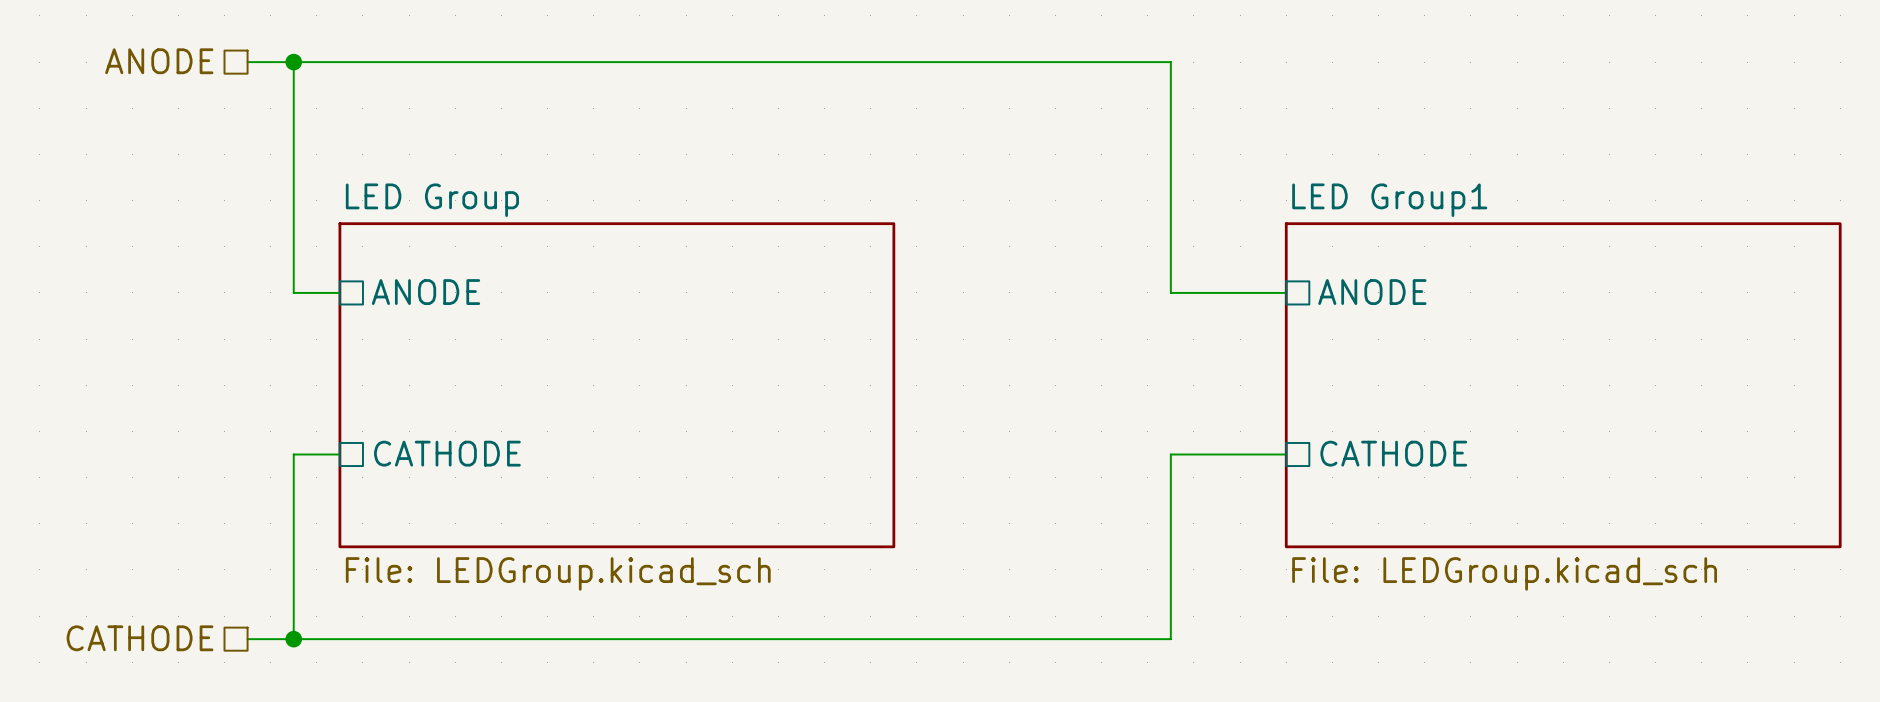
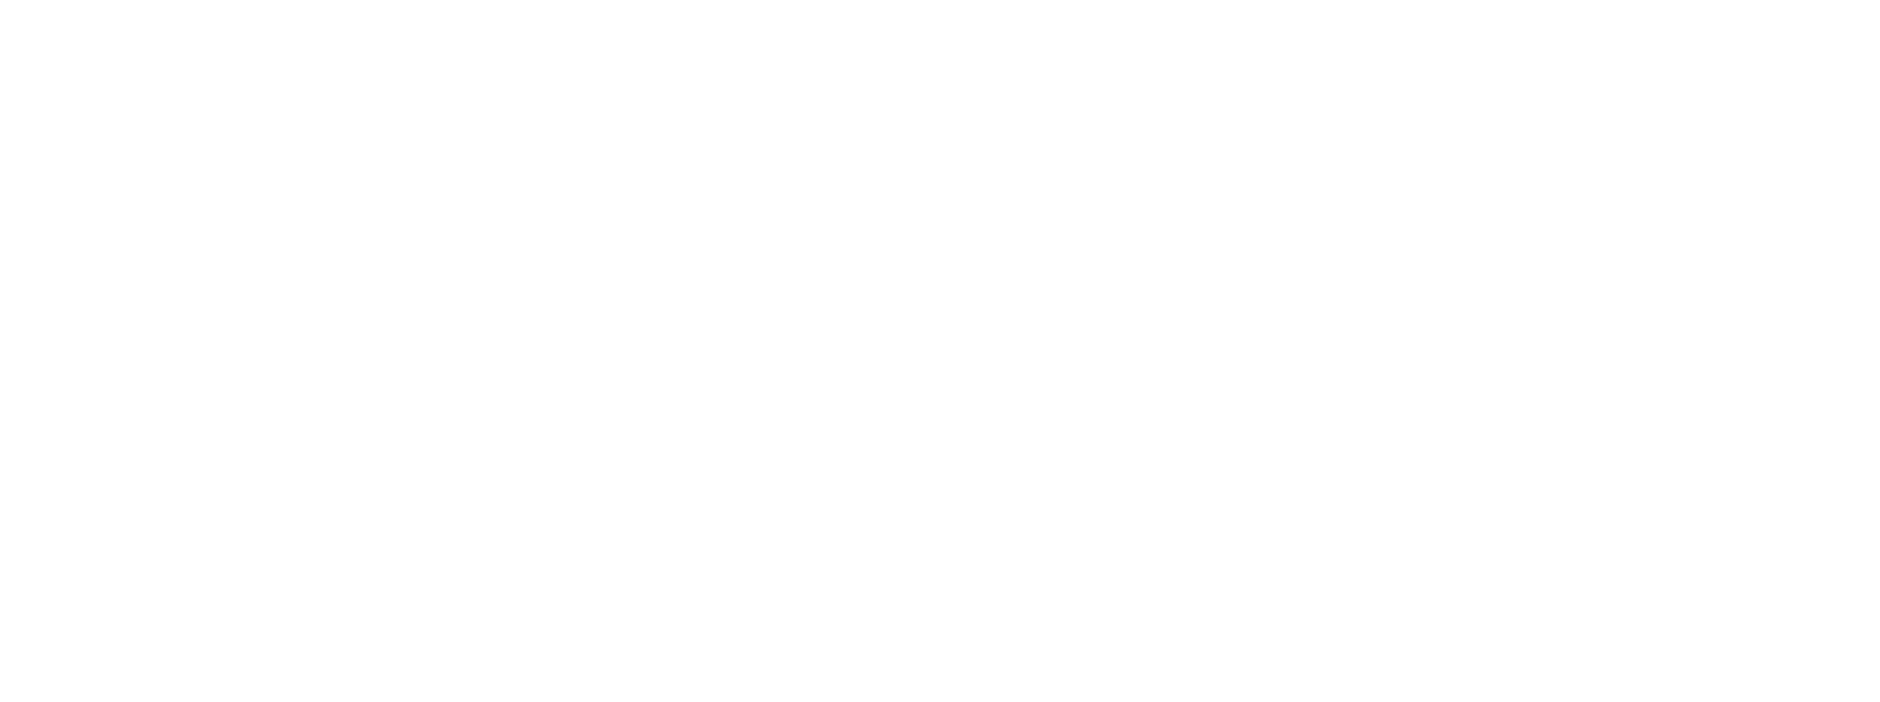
hierarchical label: ANODE (159, 61) -> none
wire: (247, 62) (1170, 62) (1170, 292) (1286, 292) -> none
wire: (293, 62) (293, 292) (339, 292) -> none
junction: (293, 62) -> none
sheet pin: ANODE (425, 292) -> none
sheet pin: ANODE (1372, 292) -> none
sheet LED Group: File: LEDGroup.kicad_sch (616, 385) -> none
sheet LED Group1: File: LEDGroup.kicad_sch (1563, 385) -> none
sheet pin: CATHODE (447, 453) -> none
sheet pin: CATHODE (1393, 453) -> none
wire: (339, 454) (293, 454) (293, 639) -> none
wire: (1286, 454) (1170, 454) (1170, 639) (247, 639) -> none
hierarchical label: CATHODE (140, 638) -> none
junction: (293, 639) -> none

